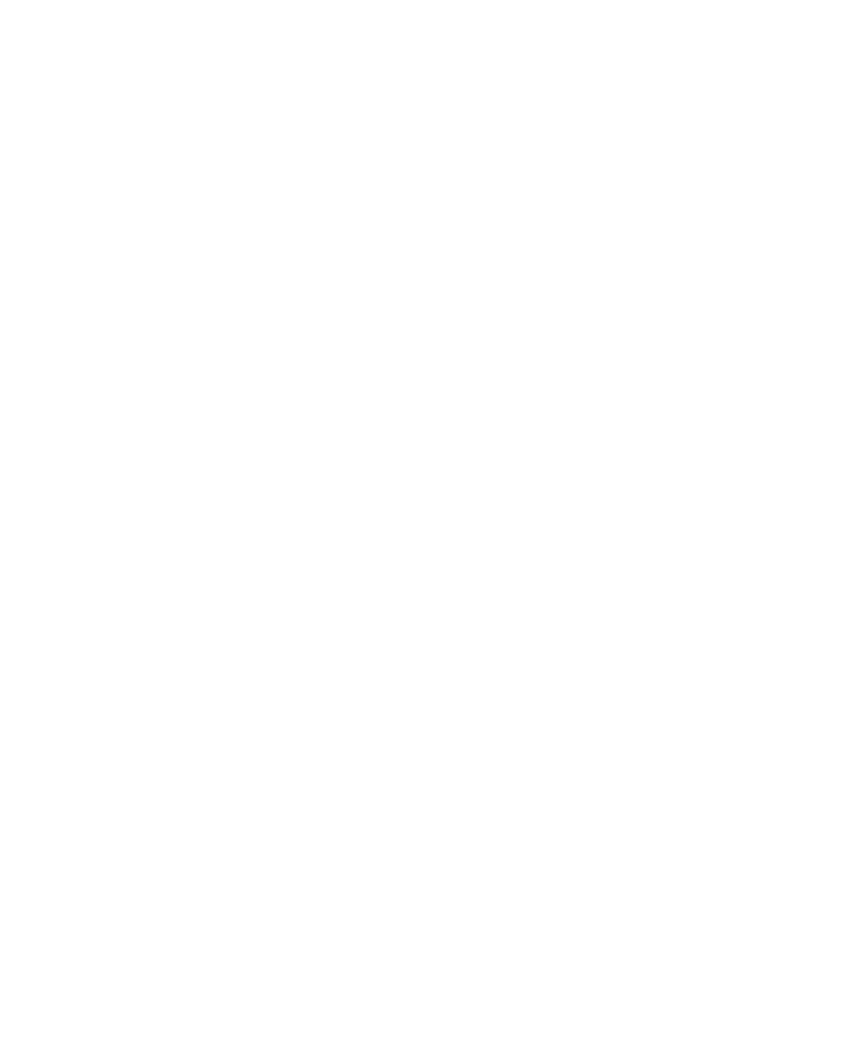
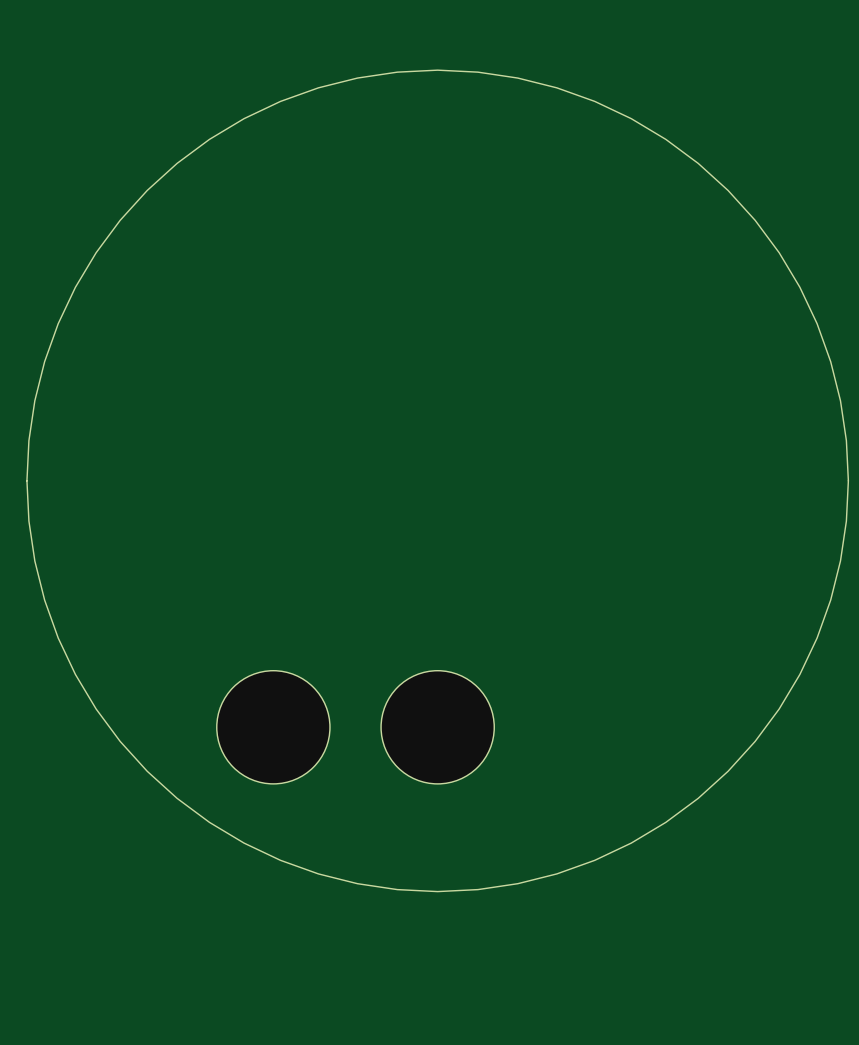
board edge: none -> (848, 480) (846, 440) (840, 400) (830, 361) (817, 323) (799, 287) (779, 252) (755, 220) (728, 190) (698, 163) (665, 139) (631, 118) (594, 101) (556, 87) (517, 78) (477, 72) (437, 70) (397, 72) (357, 78) (318, 87) (280, 101) (244, 118) (209, 139) (177, 163) (147, 190) (120, 220) (96, 252) (75, 287) (58, 323) (44, 361) (34, 400) (28, 440) (26, 480) (28, 521) (34, 561) (44, 600) (58, 638) (75, 674) (96, 709) (120, 741) (147, 771) (177, 798) (209, 822) (244, 843) (280, 860) (318, 873) (357, 883) (397, 889) (437, 891) (477, 889) (517, 883) (556, 873) (594, 860) (631, 843) (665, 822) (698, 798) (728, 771) (755, 741) (779, 709) (799, 674) (817, 638) (830, 600) (840, 561) (846, 521) (848, 480)
hole: none -> (273, 727)
hole: none -> (437, 727)

